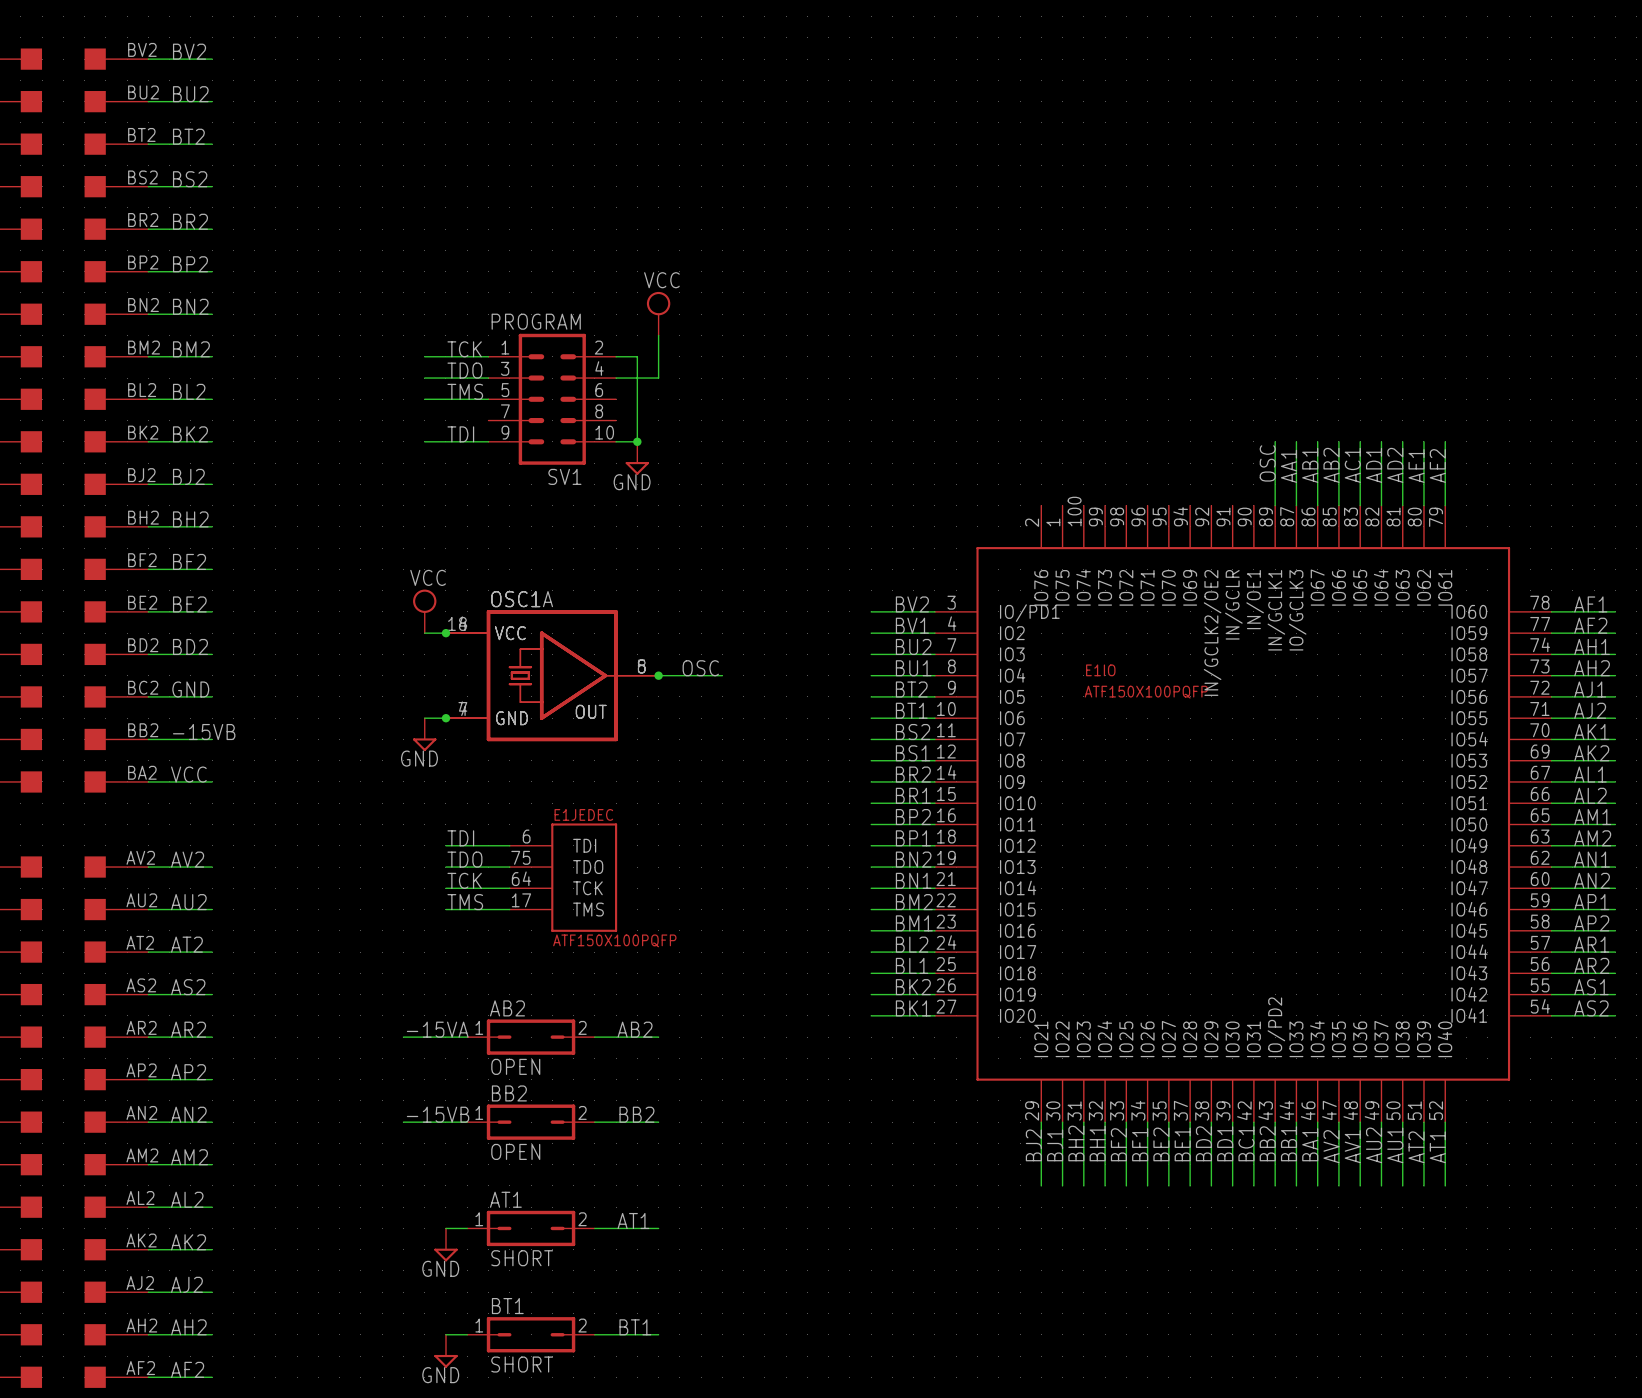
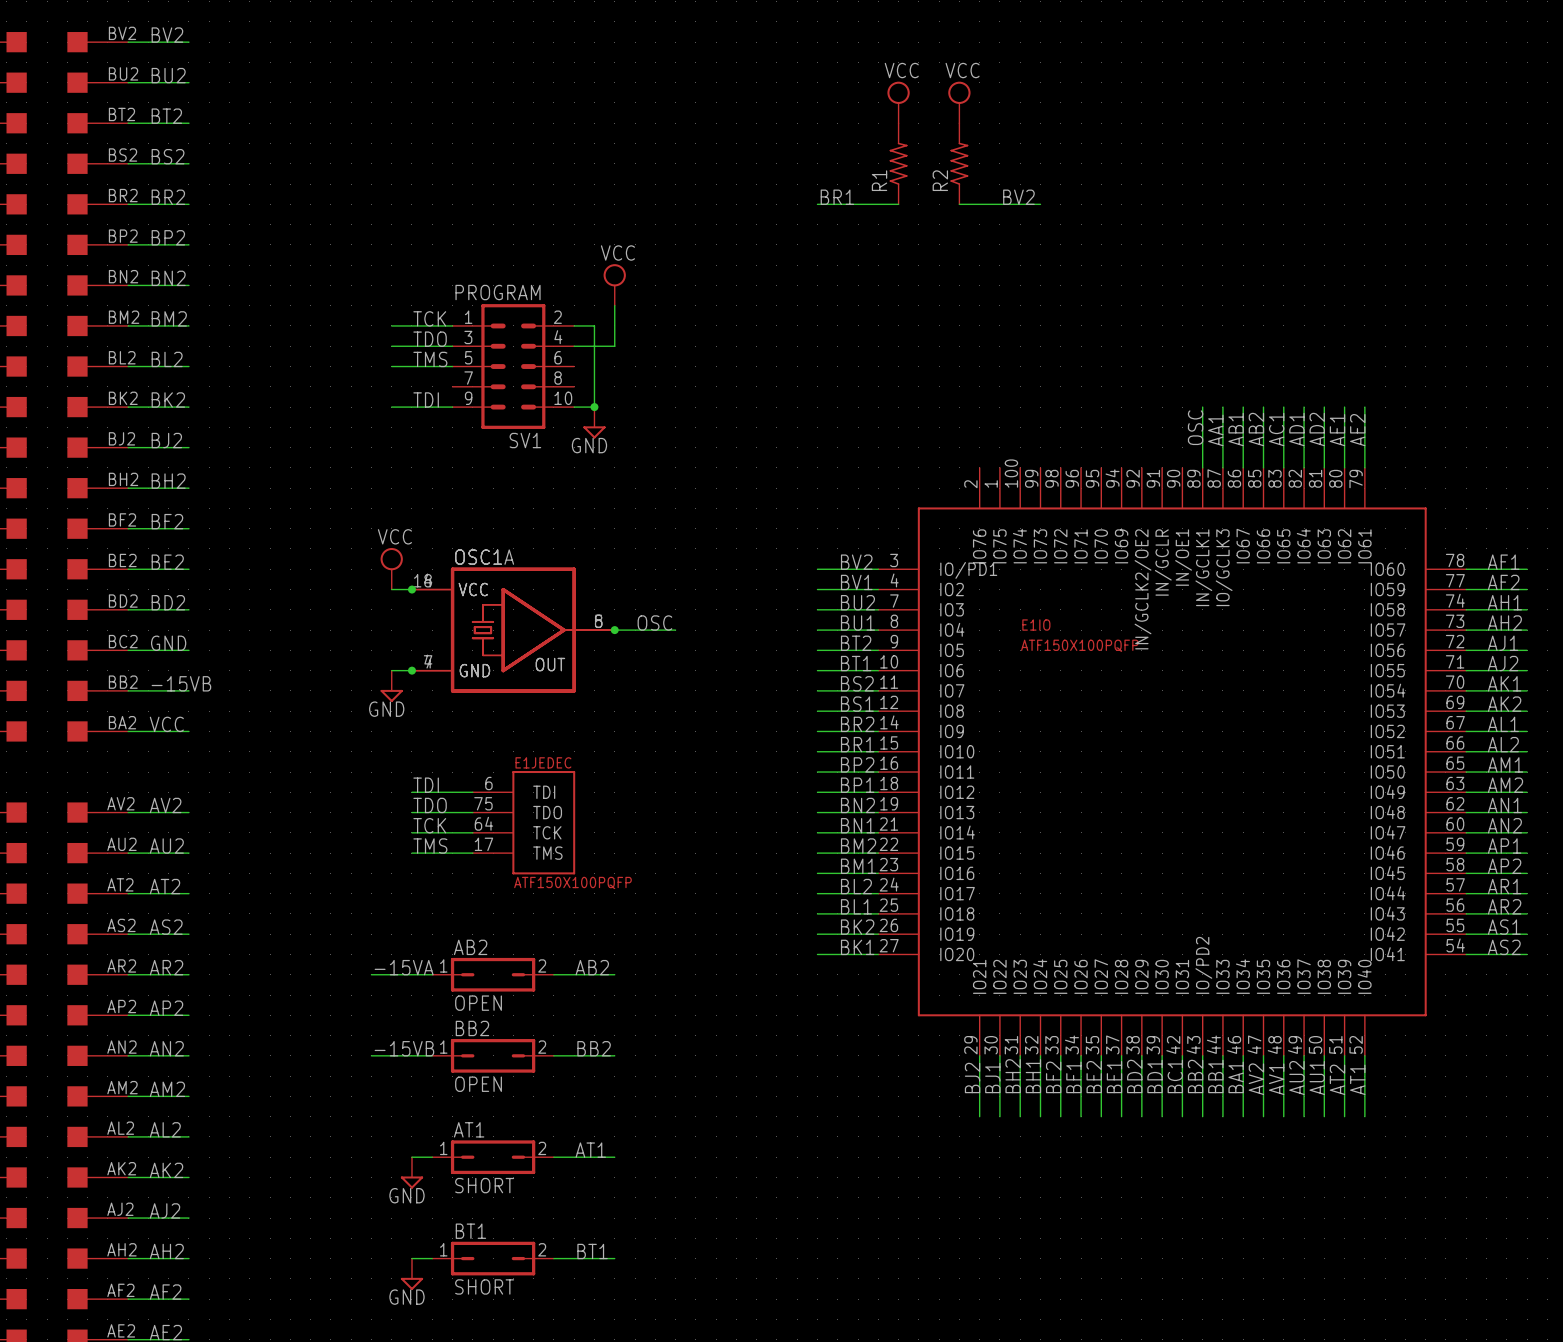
power symbol: none -> VCC (898, 102)
power symbol: none -> VCC (959, 102)
R1: none -> (898, 163)
R2: none -> (959, 163)
label: none -> BR1 (837, 197)
label: none -> BV2 (1018, 197)
wire: none -> (817, 204) (898, 204)
wire: none -> (959, 204) (1040, 204)

